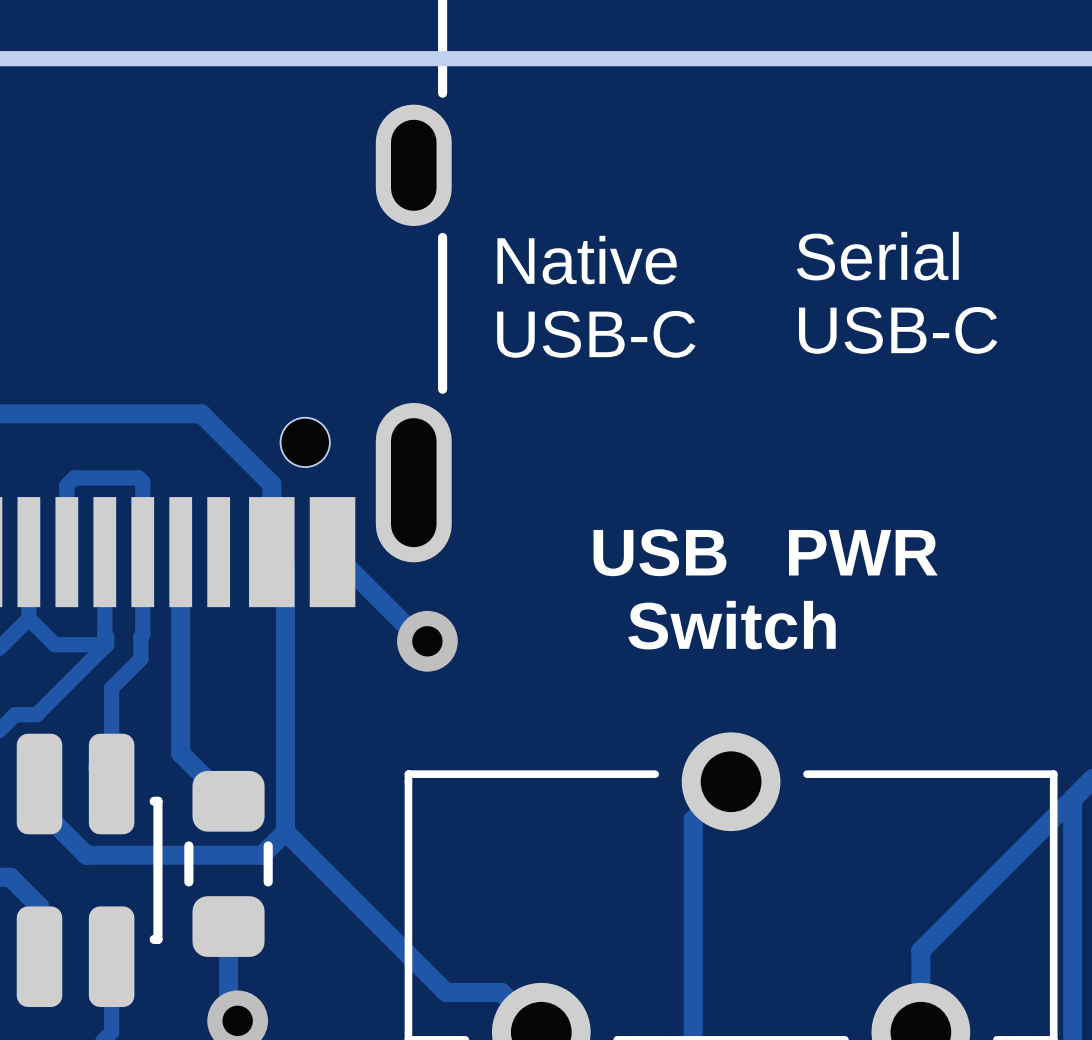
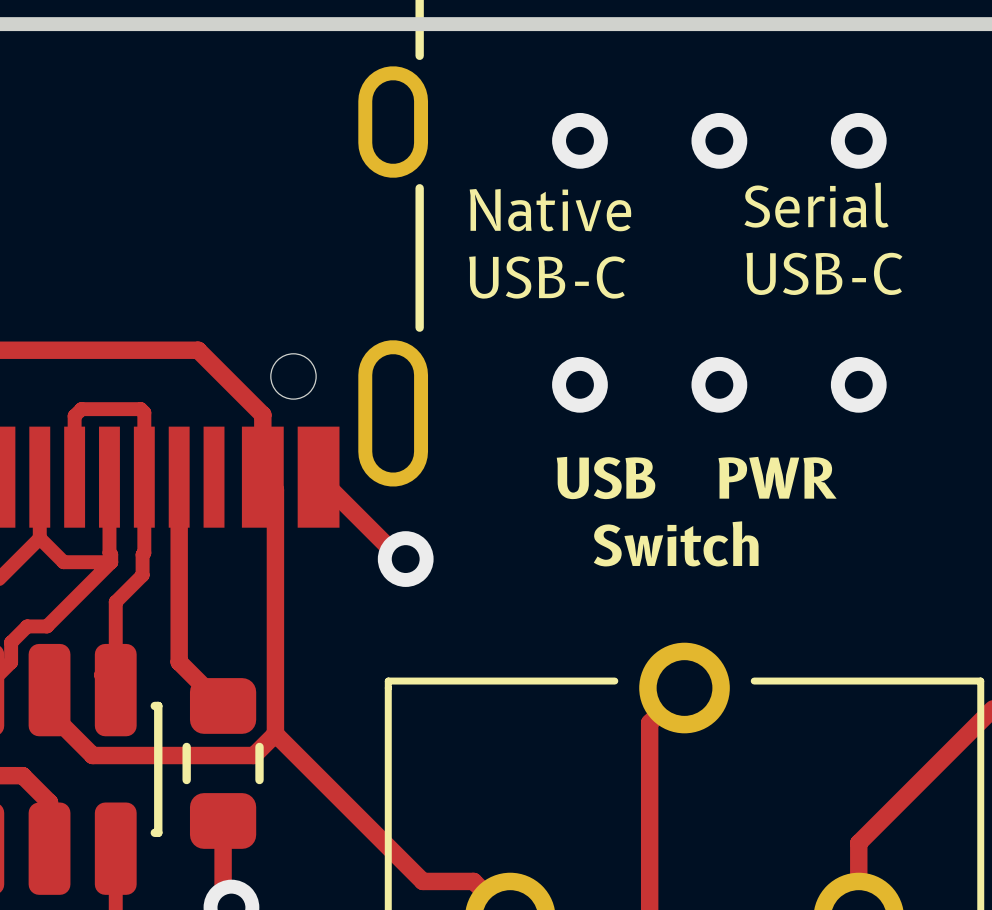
via: none -> (579, 140)
via: none -> (719, 140)
via: none -> (858, 140)
via: none -> (579, 384)
via: none -> (719, 384)
via: none -> (858, 384)

